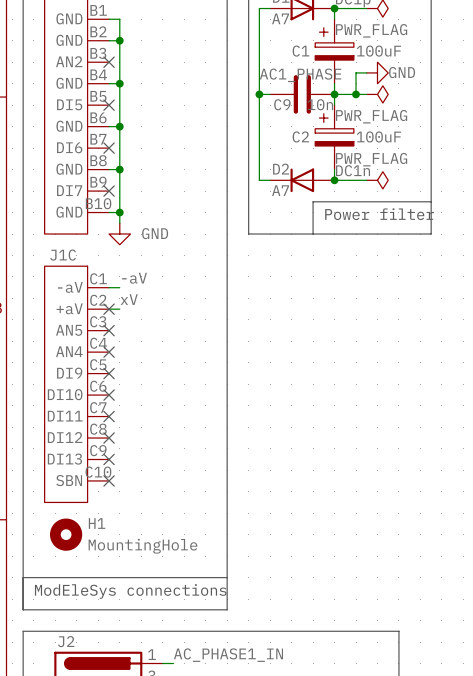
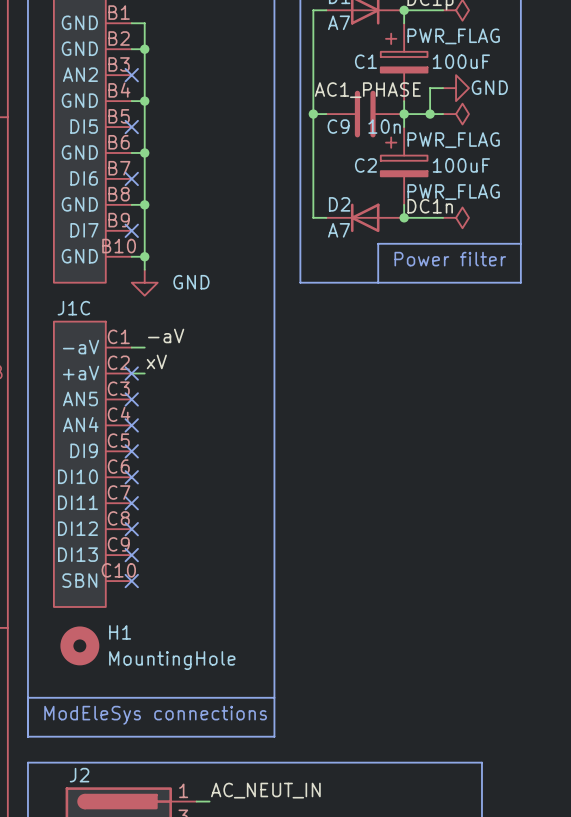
label: AC_PHASE1_IN (228, 655) -> AC_NEUT_IN (265, 790)

